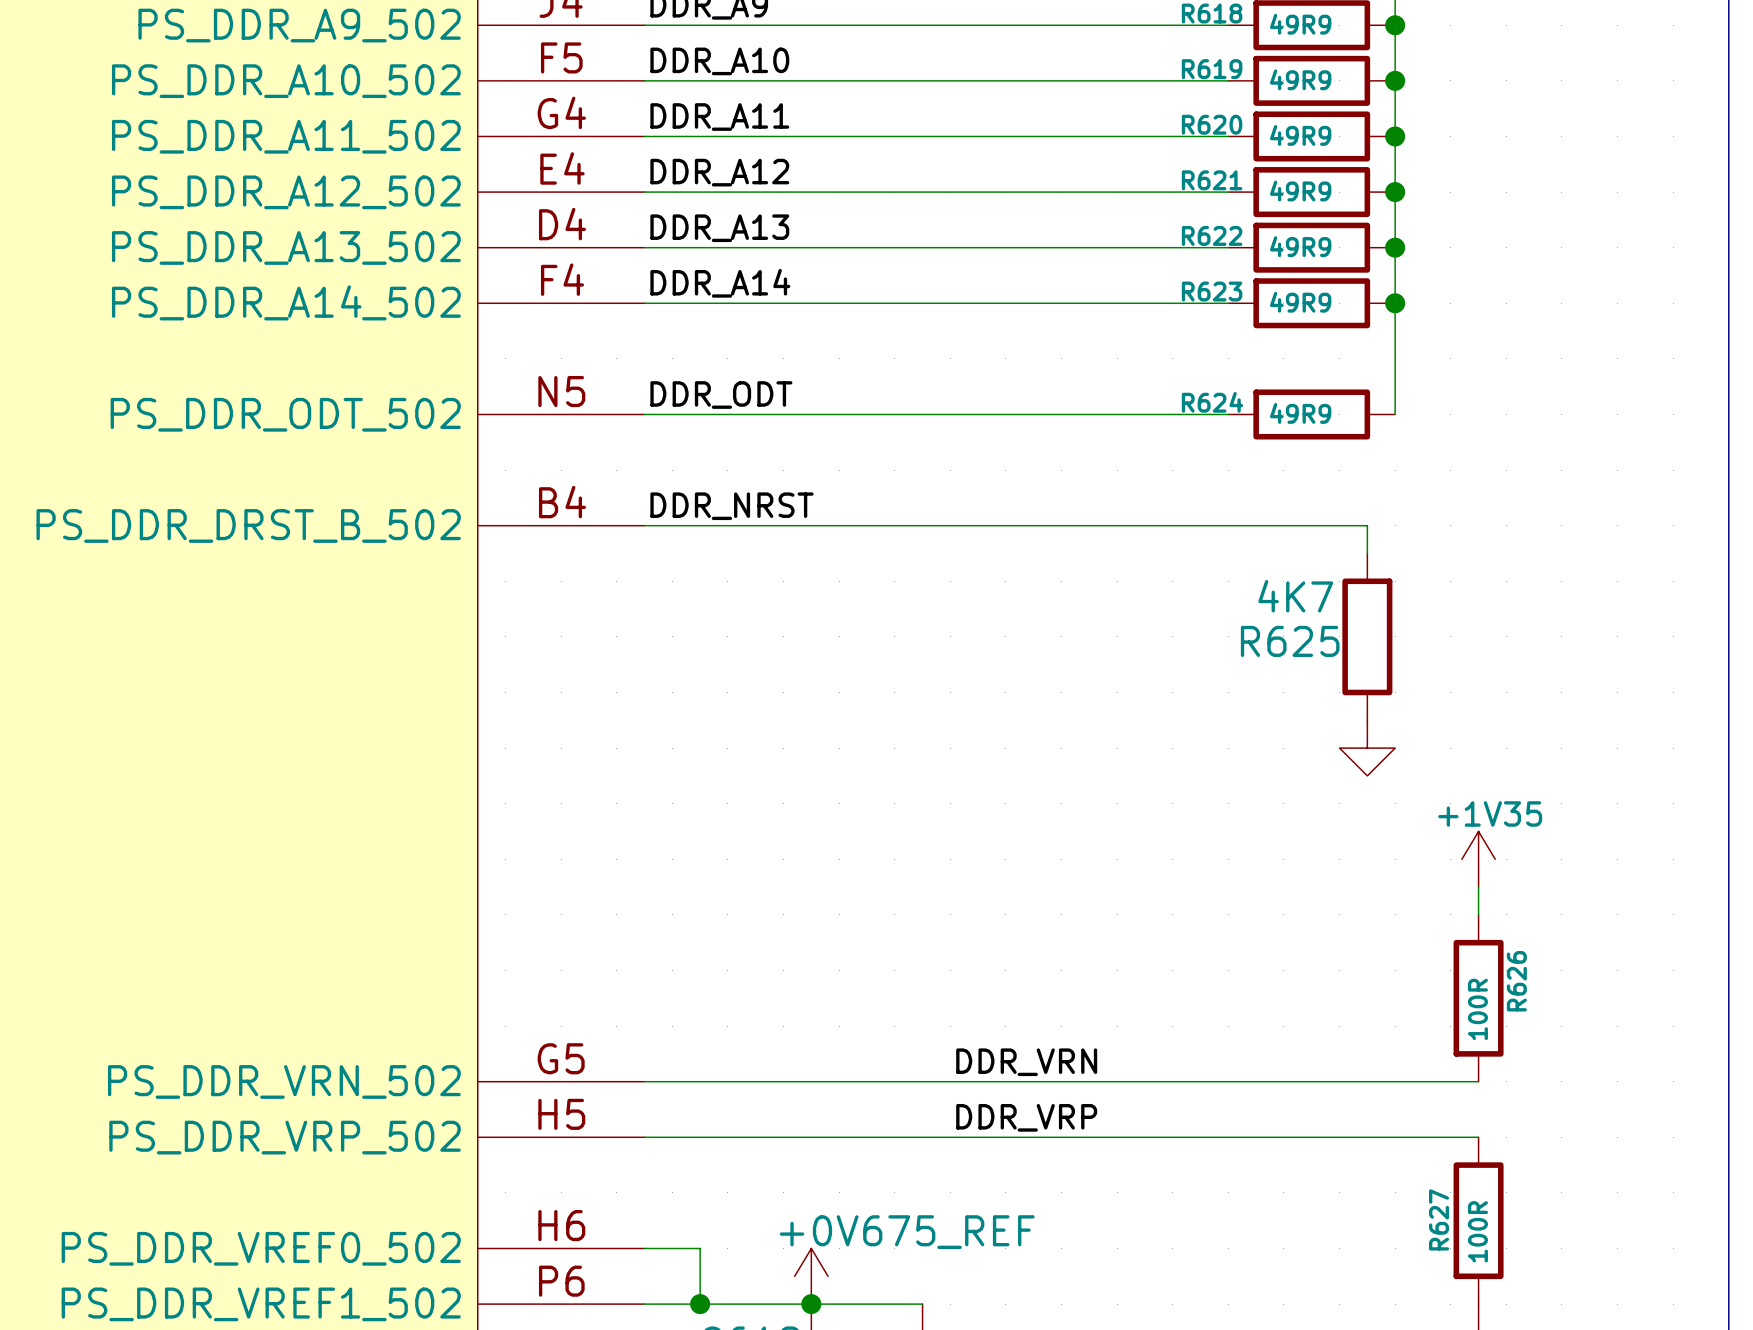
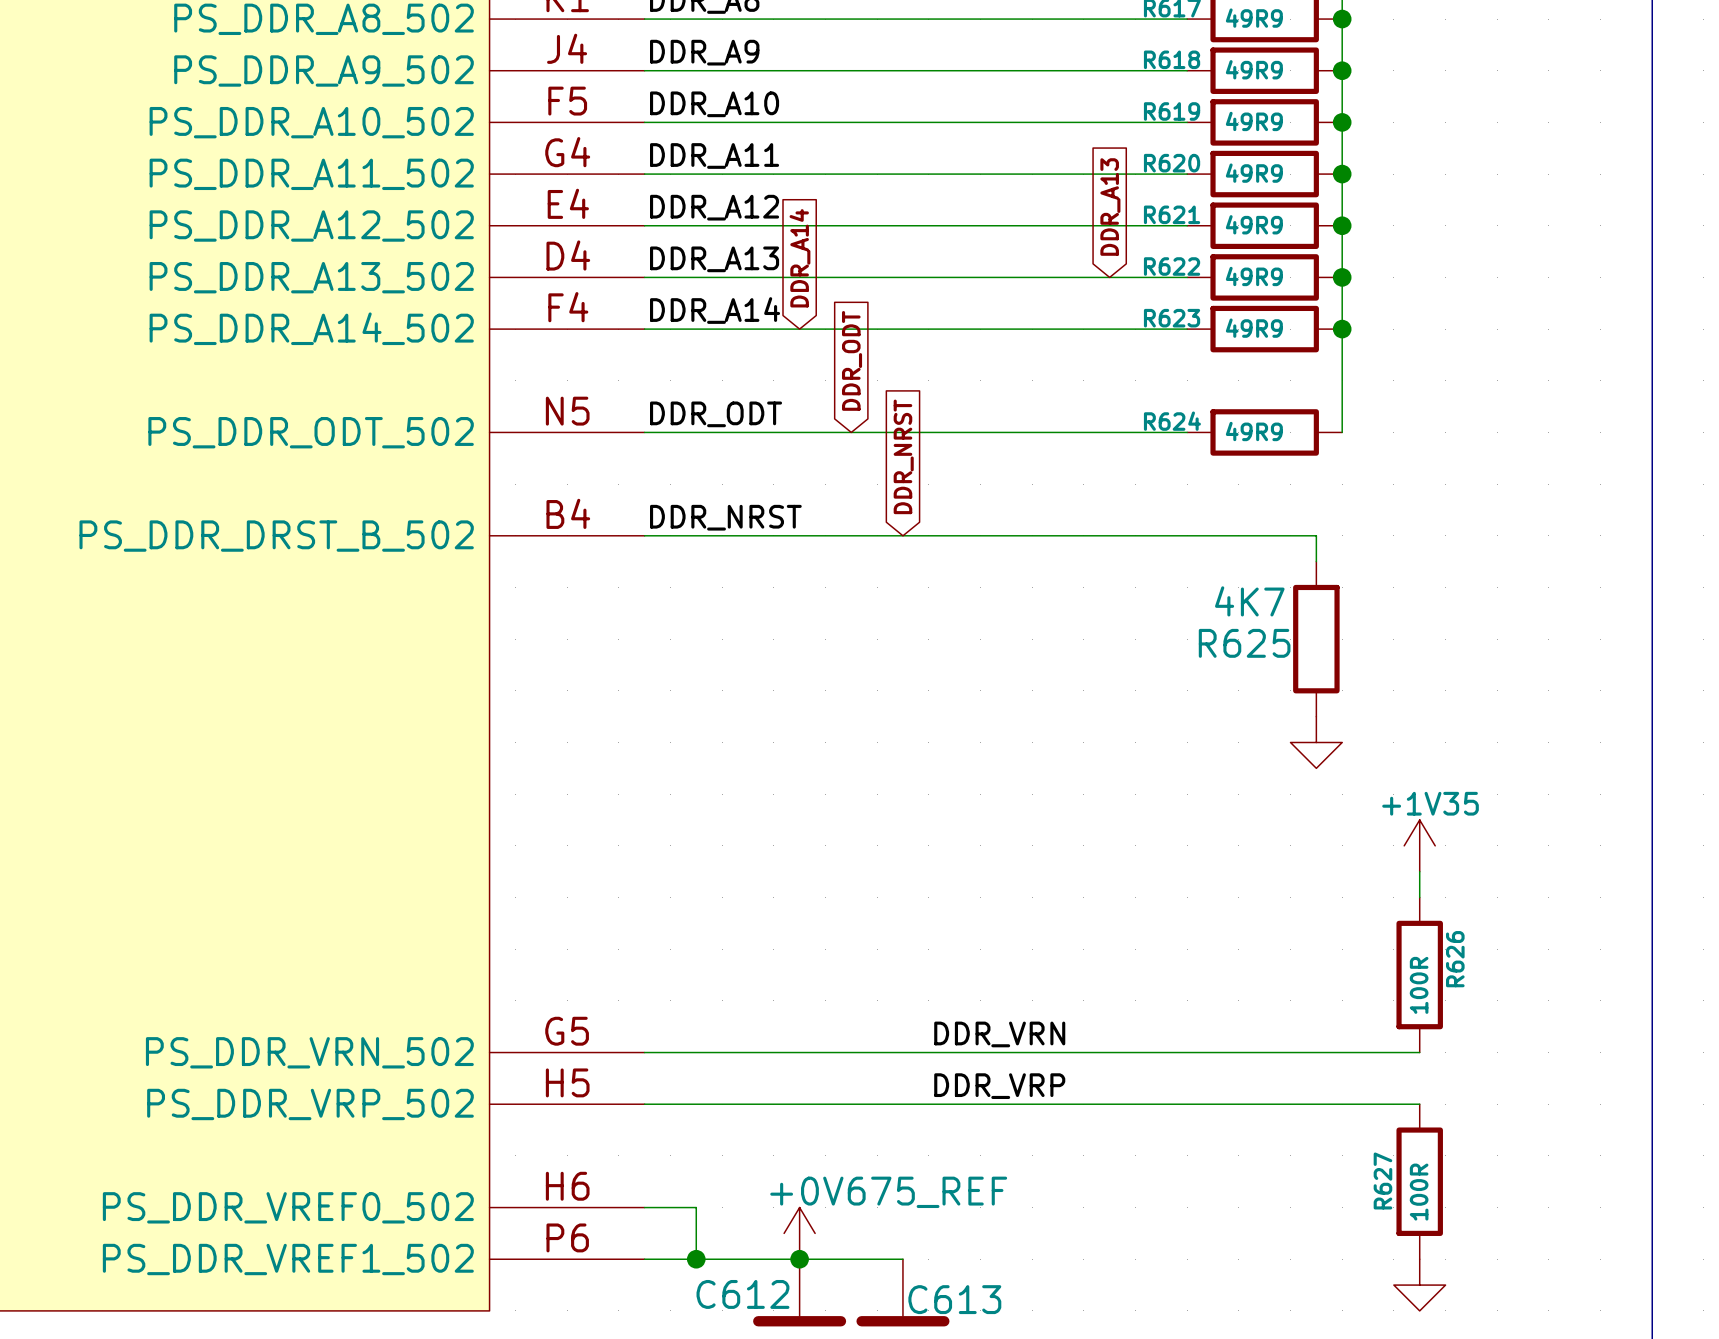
global label: none -> DDR_A13 (1110, 207)
global label: none -> DDR_A14 (799, 258)
global label: none -> DDR_ODT (852, 360)
global label: none -> DDR_NRST (903, 456)

